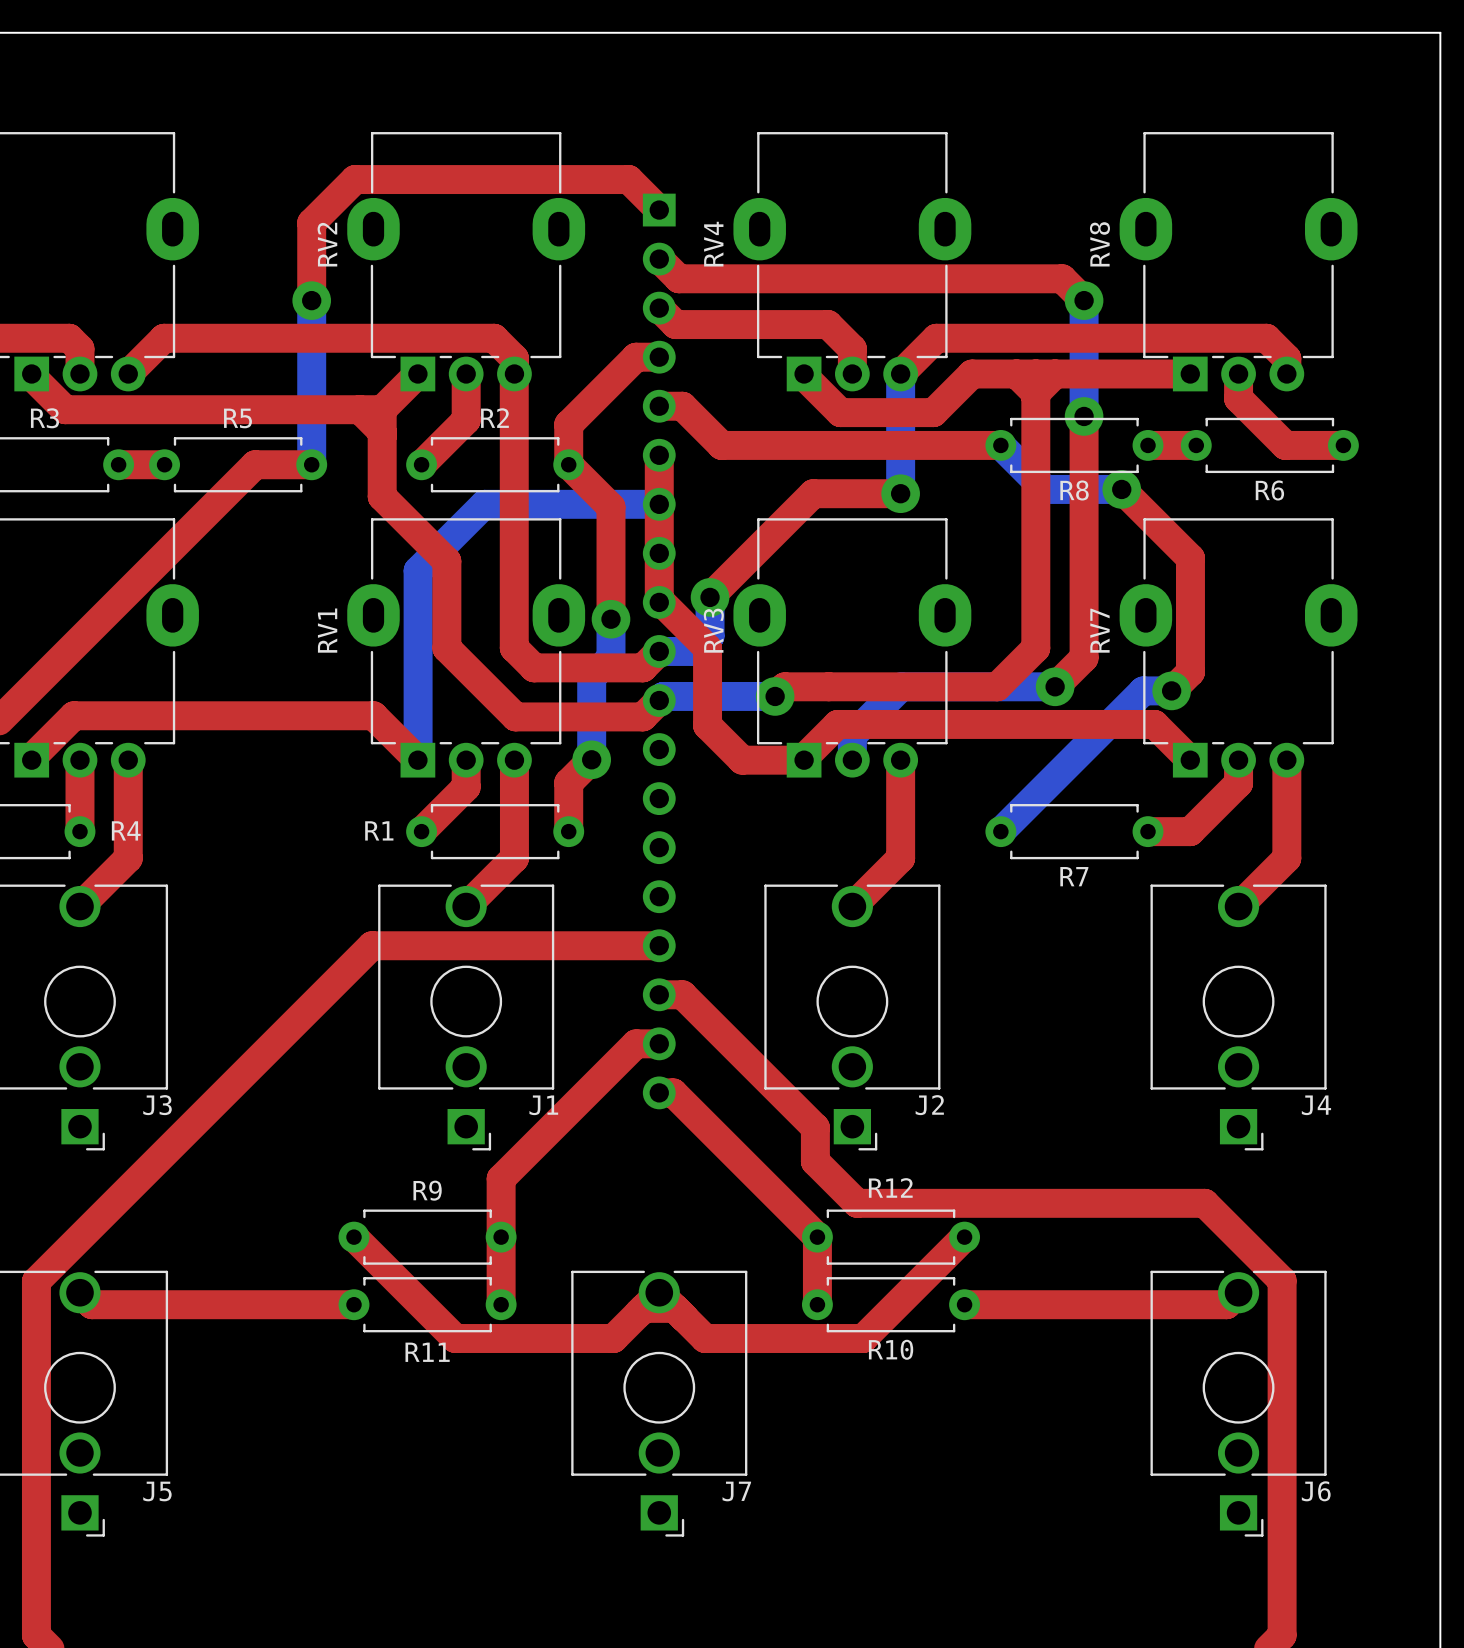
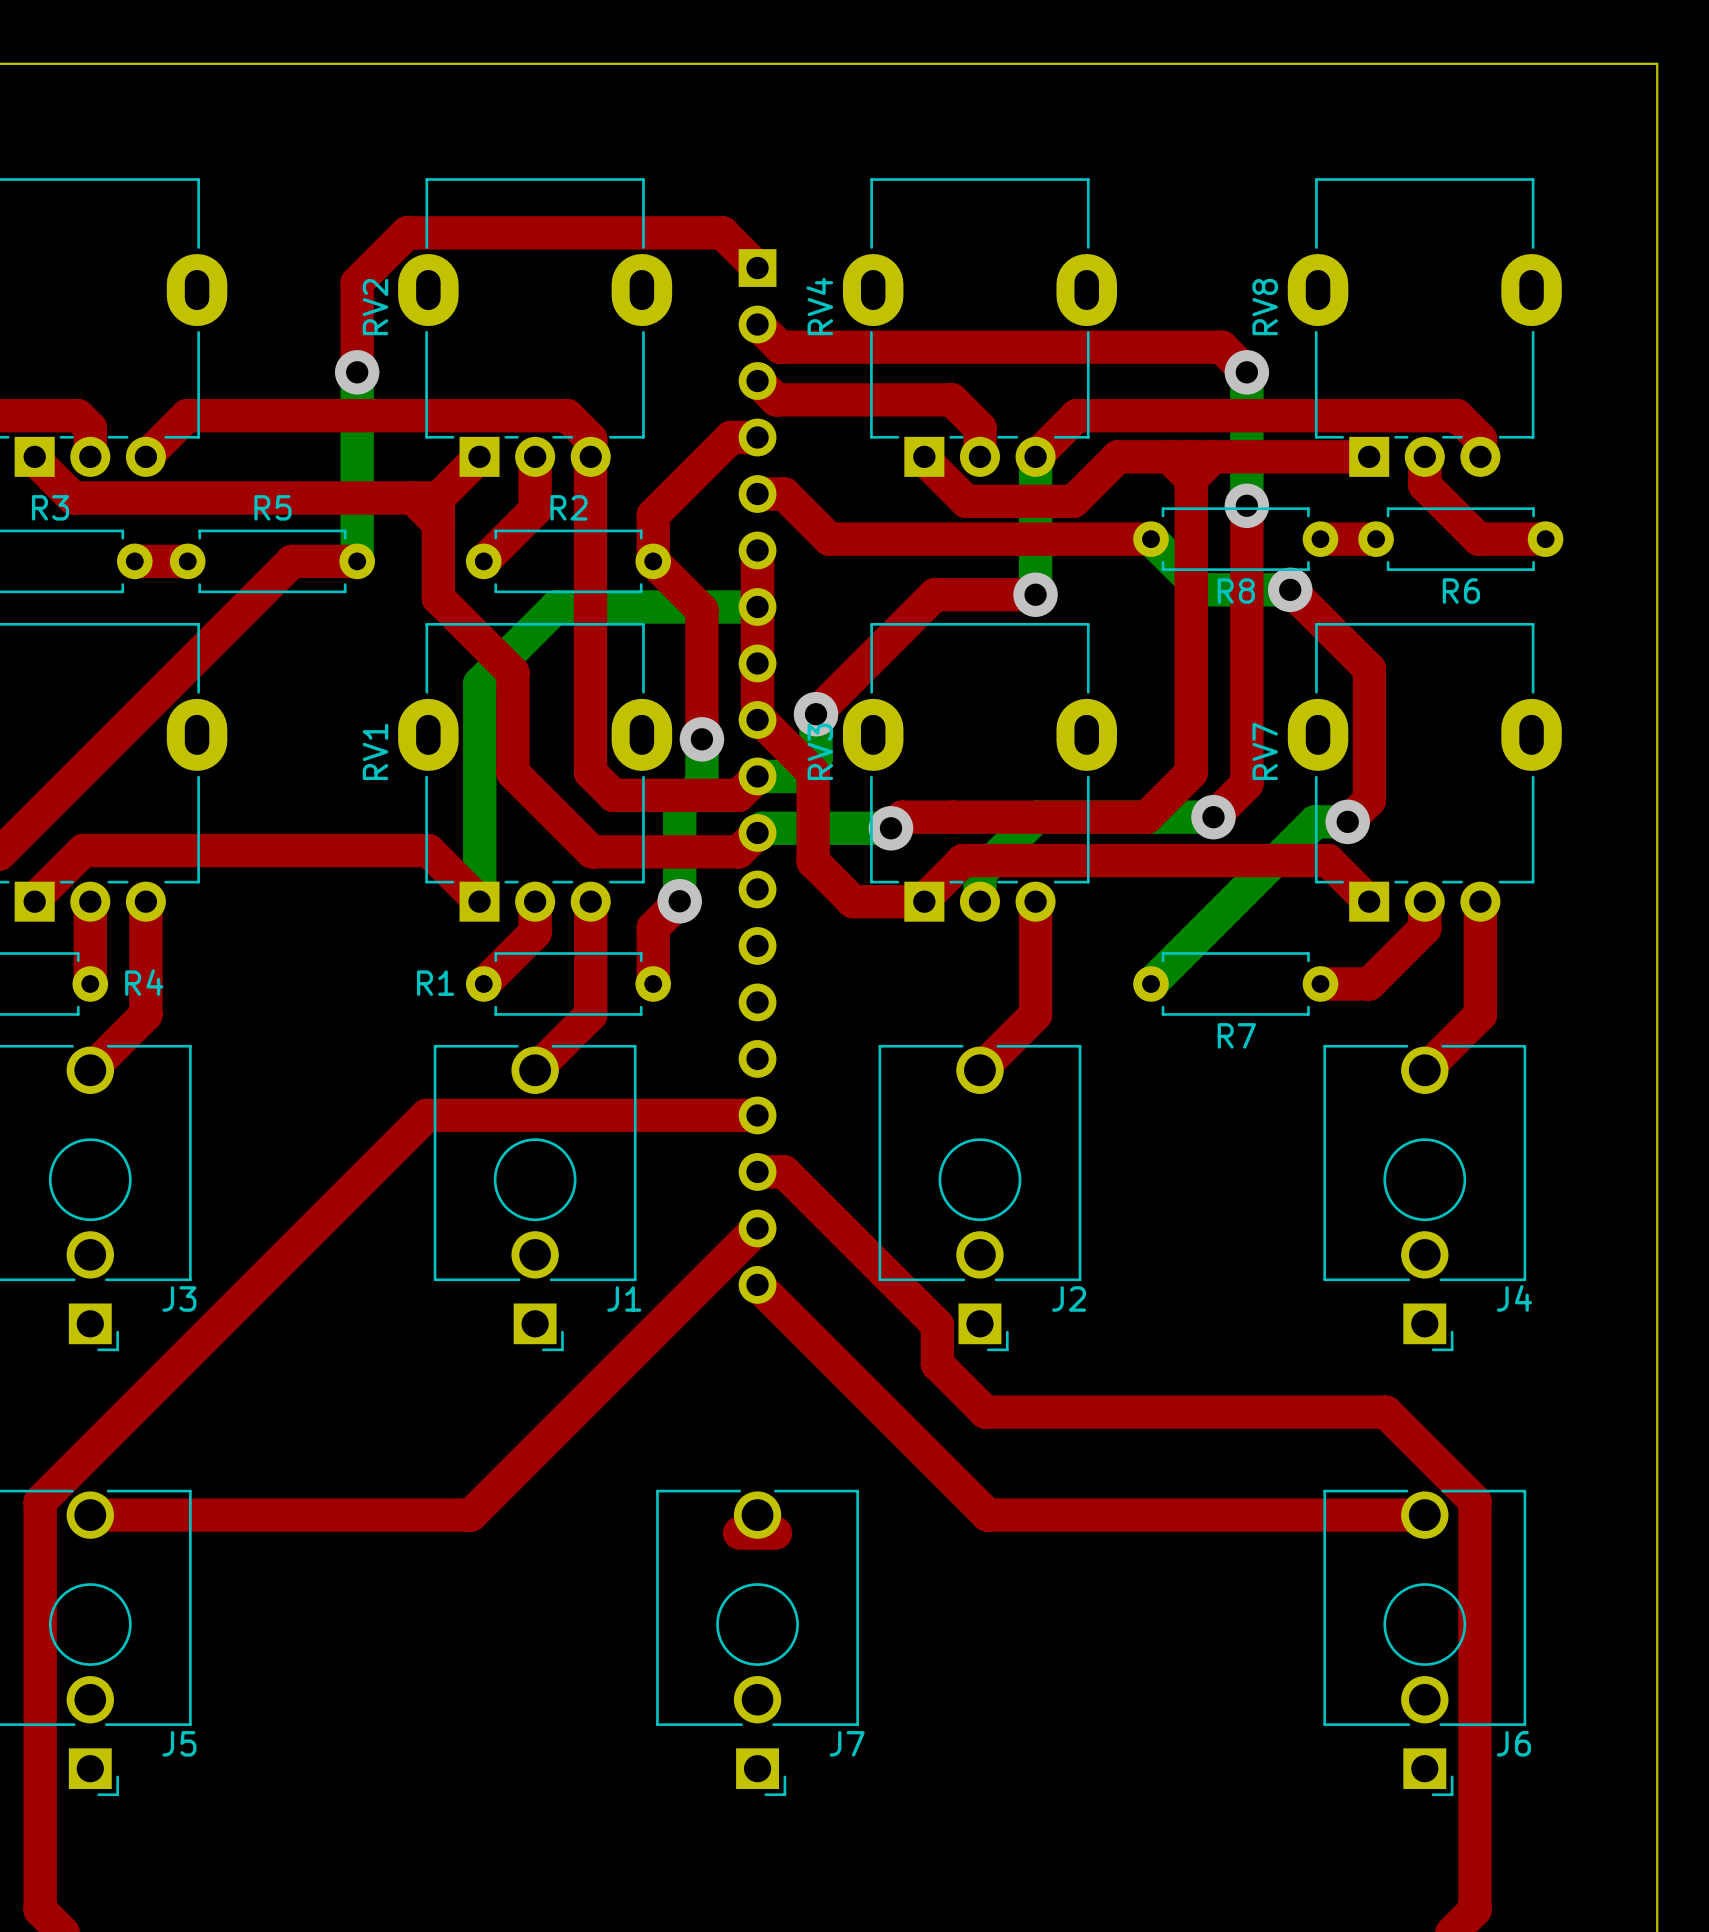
top track: (659, 1043) (636, 1043) (501, 1178) (501, 1304) -> none
top track: (659, 1092) (673, 1092) (817, 1237) (817, 1304) -> none
top track: (353, 1237) (455, 1338) (613, 1338) (659, 1292) (705, 1338) (863, 1338) (964, 1237) -> none
R9: (427, 1237) -> none
R12: (890, 1237) -> none
top track: (79, 1292) (91, 1304) (353, 1304) -> (90, 1515) (470, 1515) (757, 1228)
top track: (1238, 1292) (1226, 1304) (964, 1304) -> (1424, 1515) (987, 1515) (757, 1284)
R11: (427, 1304) -> none
R10: (890, 1304) -> none

